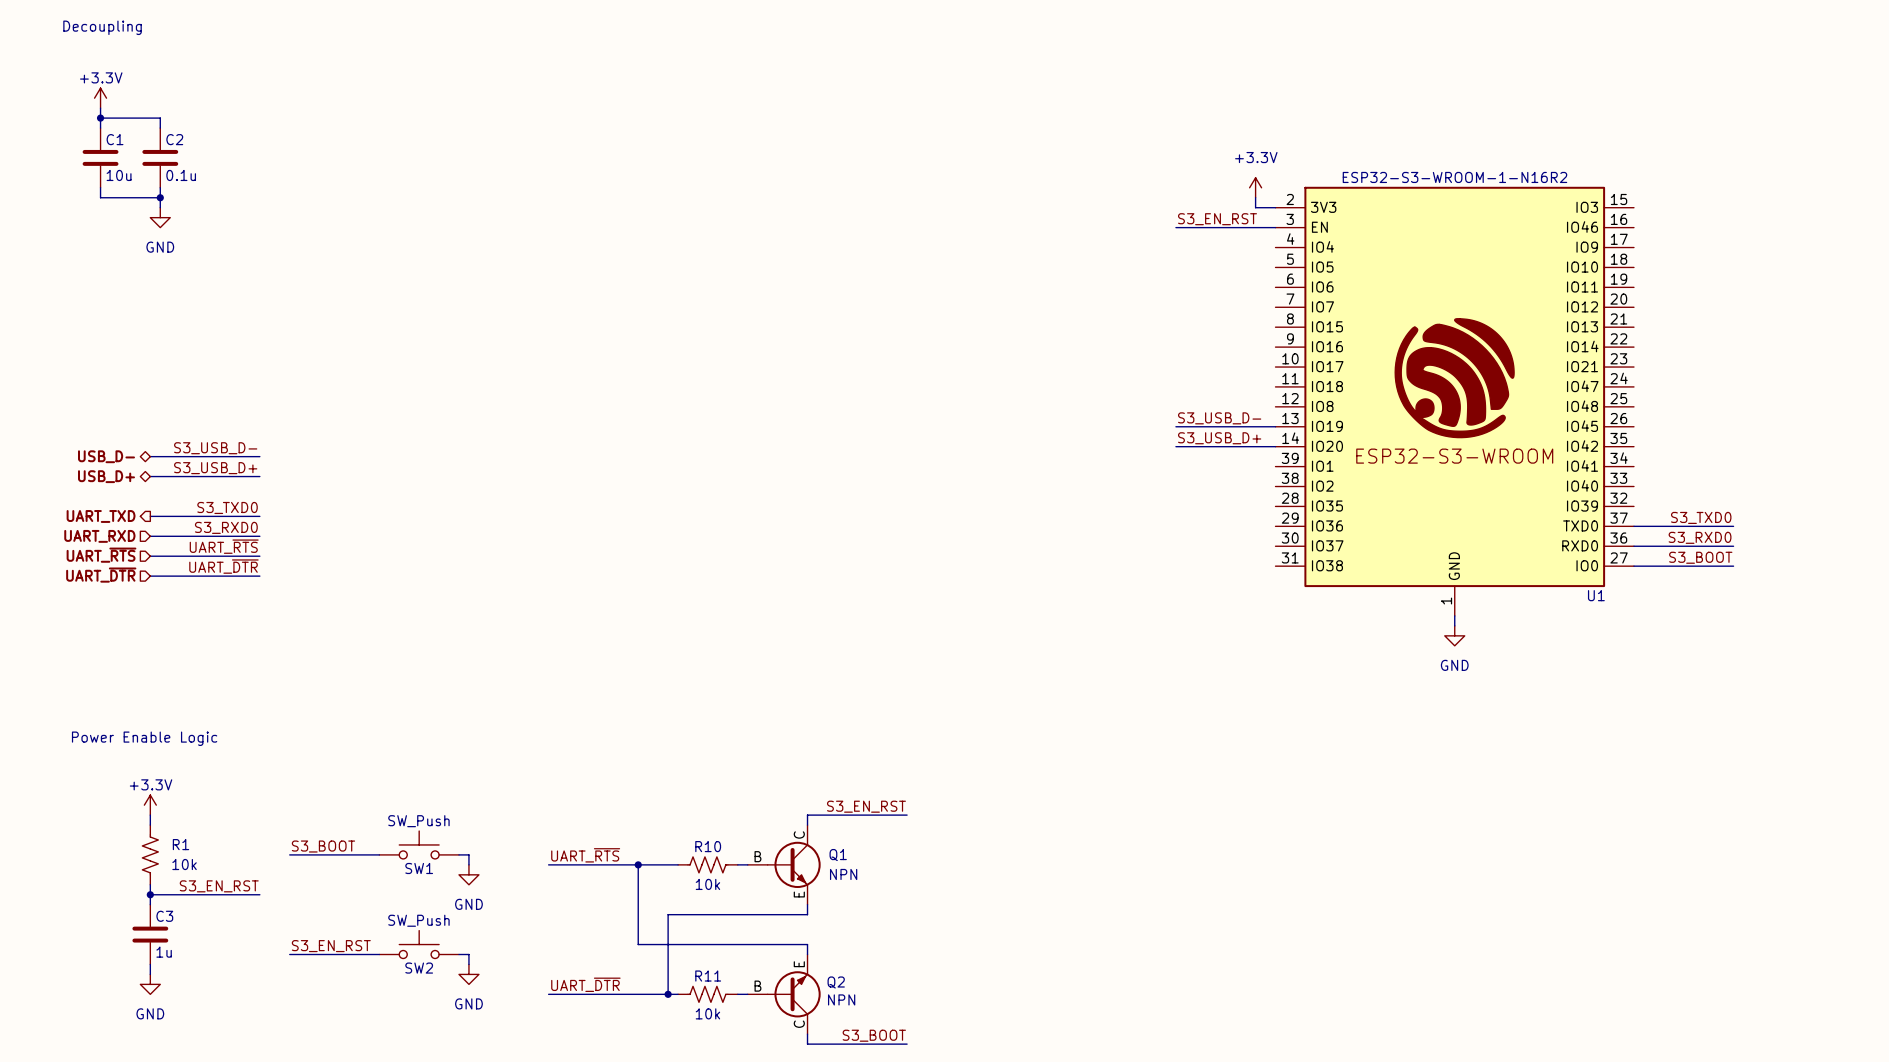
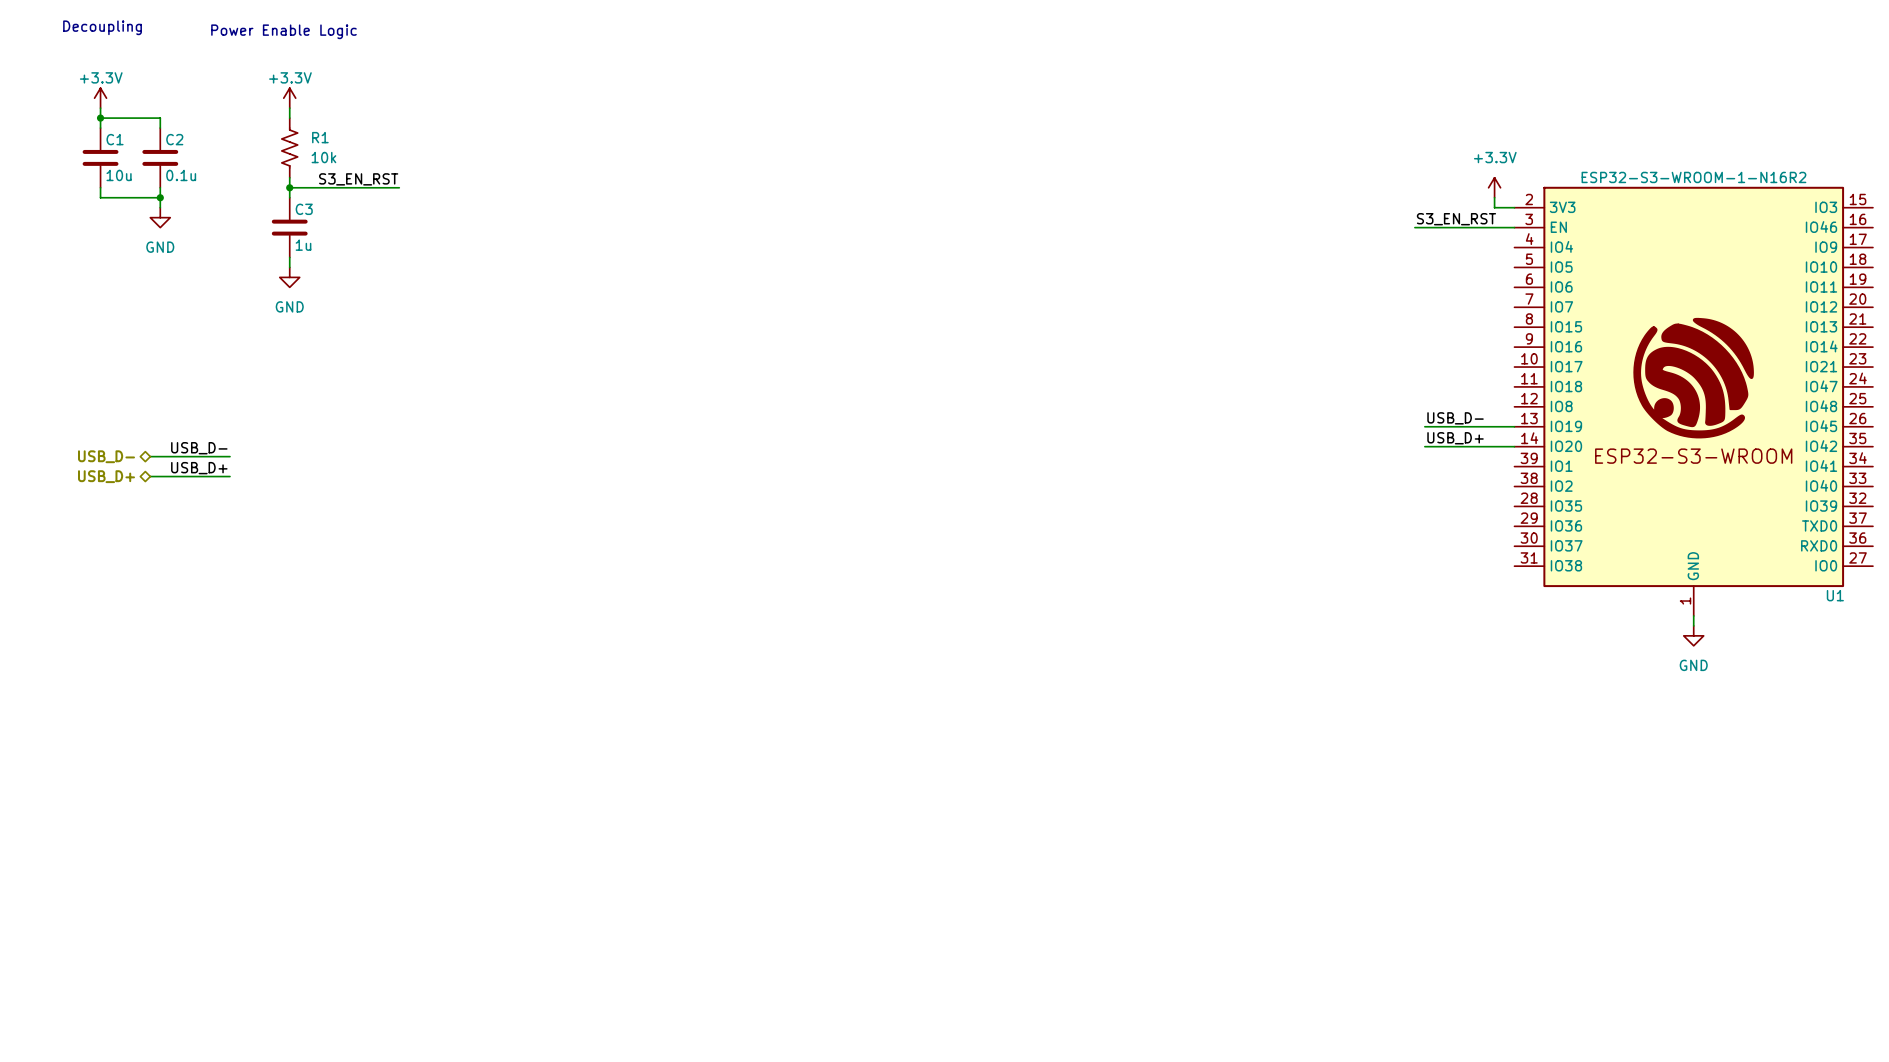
text: none -> Power Enable Logic (283, 31)
power symbol: none -> +3.3V (289, 98)
wire: none -> (289, 108) (289, 118)
wire: none -> (289, 177) (289, 197)
label: none -> S3_EN_RST (358, 179)
wire: none -> (289, 187) (399, 187)
junction: none -> (289, 187)
power symbol: +3.3V (1255, 187) -> none
power symbol: none -> +3.3V (1494, 187)
wire: (1255, 197) (1255, 207) (1275, 207) -> none
label: S3_EN_RST (1217, 219) -> none
label: none -> S3_EN_RST (1456, 219)
wire: (1175, 227) (1275, 227) -> none
wire: none -> (289, 257) (289, 267)
power symbol: none -> GND (289, 277)
U1 position: (1454, 401) -> (1693, 401)
label: S3_USB_D- (1219, 418) -> none
label: none -> USB_D- (1455, 418)
wire: (1175, 426) (1275, 426) -> none
label: S3_USB_D+ (1219, 438) -> none
label: none -> USB_D+ (1455, 438)
wire: (1175, 446) (1275, 446) -> none
label: none -> USB_D- (199, 448)
label: S3_USB_D- (215, 448) -> none
wire: (229, 456) (259, 456) -> none
label: none -> USB_D+ (199, 468)
label: S3_USB_D+ (215, 468) -> none
wire: (229, 476) (259, 476) -> none
label: S3_TXD0 (227, 507) -> none
hierarchical label: UART_TXD (101, 516) -> none
wire: (150, 516) (259, 516) -> none
label: S3_TXD0 (1701, 517) -> none
label: S3_RXD0 (226, 527) -> none
hierarchical label: UART_RXD (99, 536) -> none
wire: (150, 536) (259, 536) -> none
label: S3_RXD0 (1700, 537) -> none
label: UART_~{RTS} (224, 546) -> none
hierarchical label: UART_~{RTS} (101, 555) -> none
wire: (150, 556) (259, 556) -> none
label: S3_BOOT (1700, 557) -> none
label: UART_~{DTR} (223, 566) -> none
hierarchical label: UART_~{DTR} (101, 575) -> none
wire: (150, 576) (259, 576) -> none
wire: (1454, 615) (1454, 625) -> none
wire: none -> (1693, 615) (1693, 625)
power symbol: GND (1454, 635) -> none
power symbol: none -> GND (1693, 635)
text: Power Enable Logic (144, 738) -> none
power symbol: +3.3V (150, 805) -> none
label: S3_EN_RST (866, 806) -> none
wire: (150, 815) (150, 825) -> none
wire: (907, 815) (807, 815) (807, 825) -> none
SW1: SW_Push (419, 844) -> none
label: S3_BOOT (323, 846) -> none
R1 position: (150, 854) -> (289, 147)
wire: (289, 854) (379, 854) -> none
wire: (459, 854) (468, 854) (468, 864) -> none
label: UART_~{RTS} (585, 855) -> none
wire: (548, 864) (678, 864) -> none
wire: (638, 864) (638, 944) (807, 944) (807, 954) -> none
junction: (638, 864) -> none
R10: 10k (707, 864) -> none
wire: (737, 864) (747, 864) -> none
Q1: NPN (784, 864) -> none
power symbol: GND (468, 874) -> none
wire: (150, 884) (150, 904) -> none
label: S3_EN_RST (219, 886) -> none
wire: (150, 894) (259, 894) -> none
junction: (150, 894) -> none
wire: (807, 904) (807, 914) (668, 914) (668, 994) -> none
C3 position: (150, 934) -> (289, 227)
SW2: SW_Push (419, 944) -> none
label: S3_EN_RST (331, 946) -> none
wire: (289, 954) (379, 954) -> none
wire: (459, 954) (468, 954) (468, 964) -> none
wire: (150, 964) (150, 974) -> none
power symbol: GND (468, 974) -> none
power symbol: GND (150, 984) -> none
label: UART_~{DTR} (585, 984) -> none
wire: (548, 994) (678, 994) -> none
junction: (668, 994) -> none
R11: 10k (707, 994) -> none
wire: (737, 994) (747, 994) -> none
Q2: NPN (784, 994) -> none
wire: (807, 1034) (807, 1044) (907, 1044) -> none
label: S3_BOOT (874, 1035) -> none

